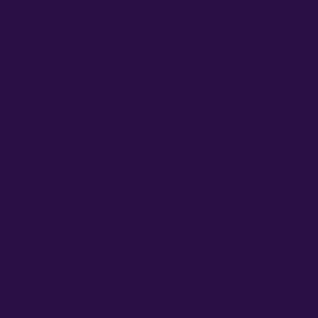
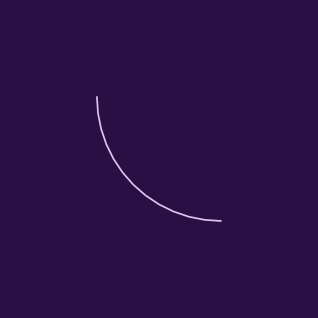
board edge: none -> (96, 96) (97, 113) (106, 144) (122, 172) (133, 184) (158, 204) (173, 211) (188, 216) (220, 220)

